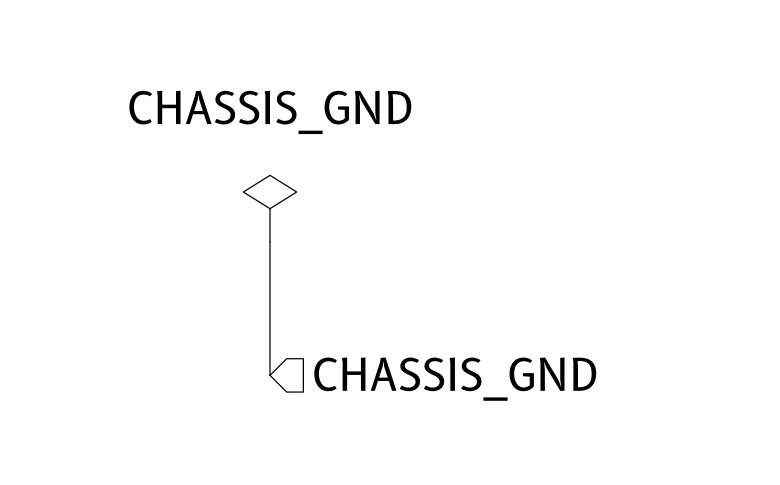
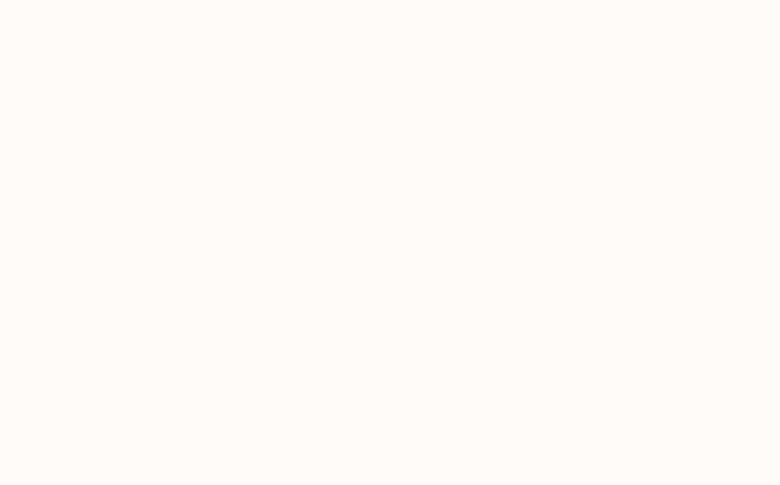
power symbol: CHASSIS_GND (270, 208) -> none
wire: (270, 242) (270, 375) -> none
hierarchical label: CHASSIS_GND (455, 379) -> none

